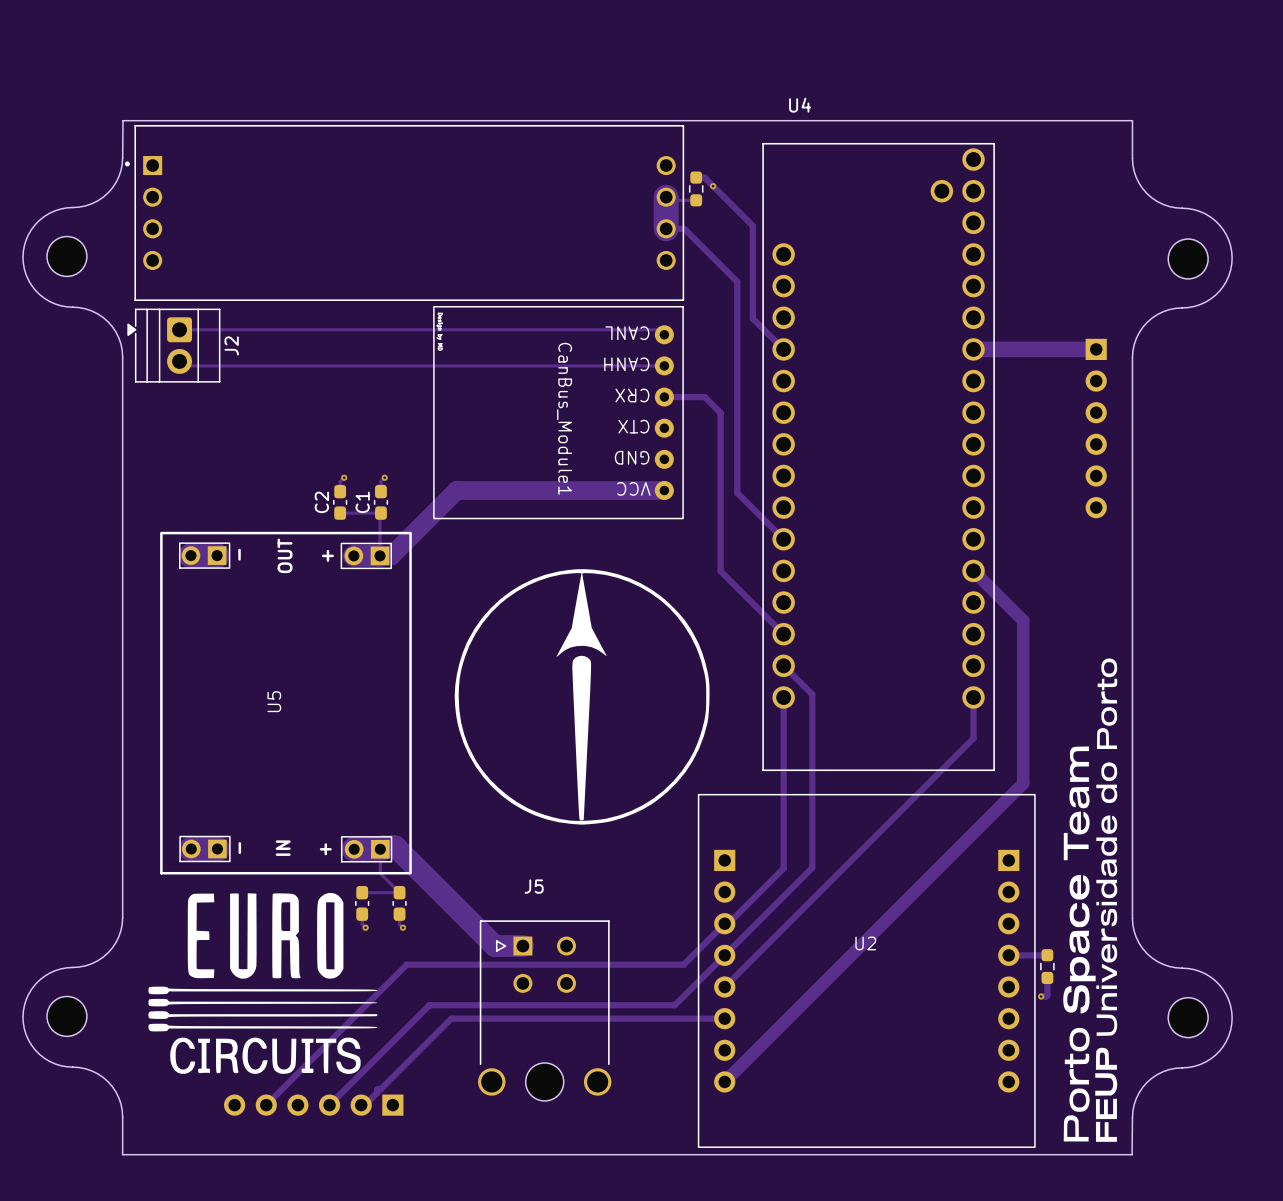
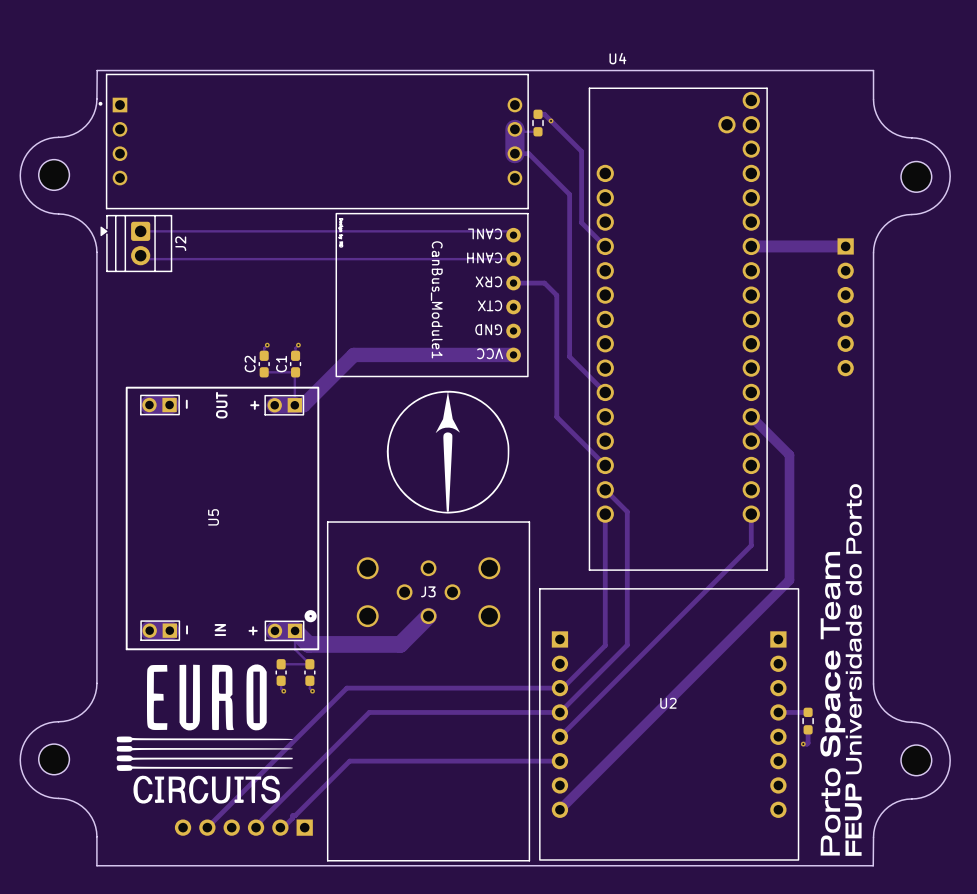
drawing: none -> [386, 390, 510, 514]
drawing: [454, 569, 710, 825] -> none
track: (380, 849) (383, 846) (395, 846) (494, 946) (522, 946) -> (295, 630) (308, 644) (400, 644) (428, 616)
track: (724, 923) (683, 964) (406, 964) -> (559, 688) (346, 688) (315, 719)
J3: none -> (417, 691)
track: (724, 955) (674, 1005) (429, 1005) (329, 1105) -> (559, 712) (369, 712) (256, 825)
J5: (544, 1010) -> none

